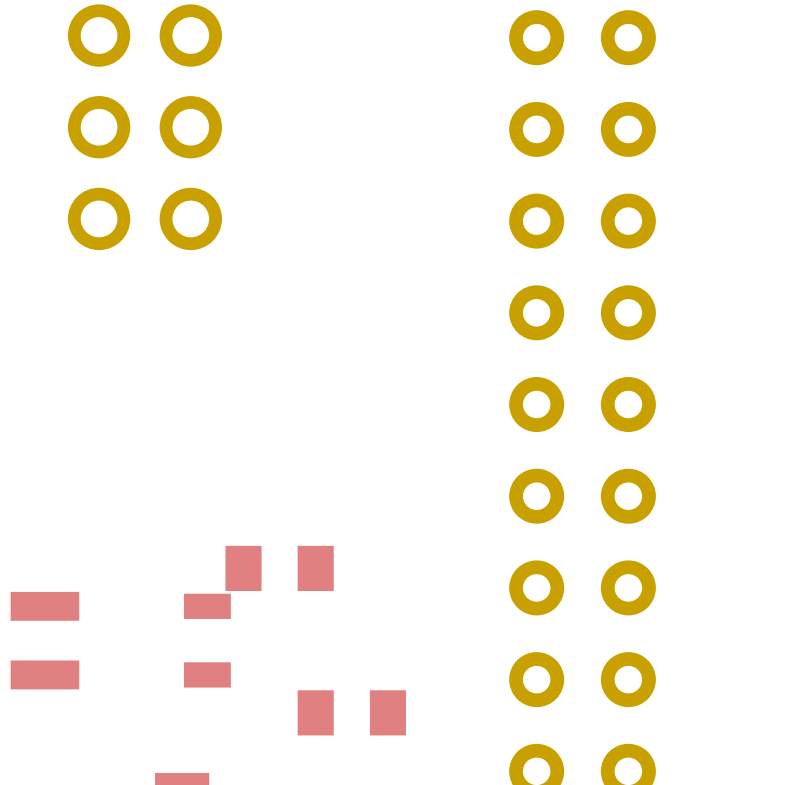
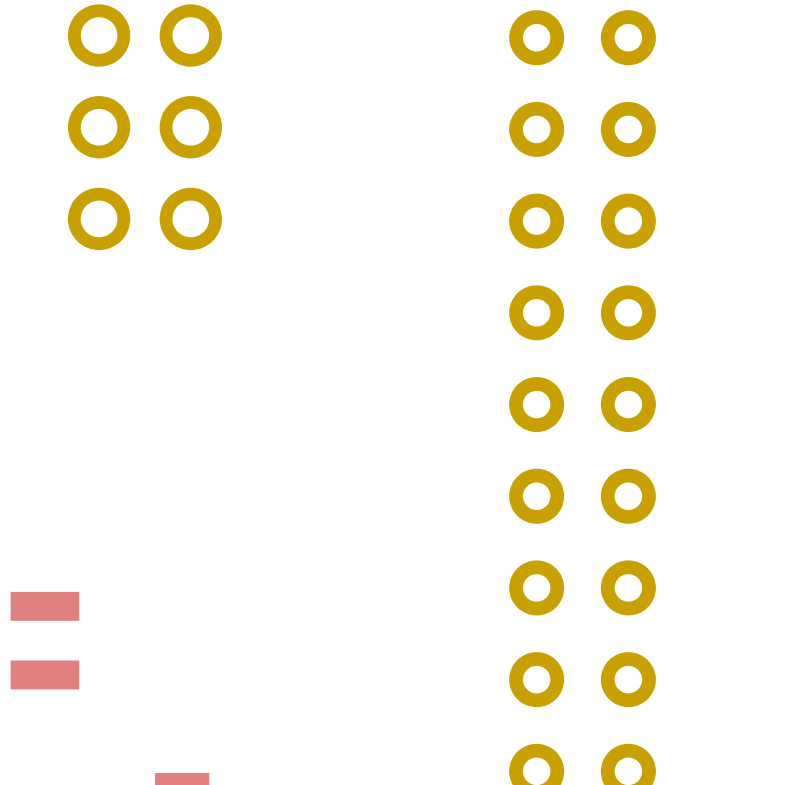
part: (279, 568) -> none
part: (207, 640) -> none
part: (351, 712) -> none

